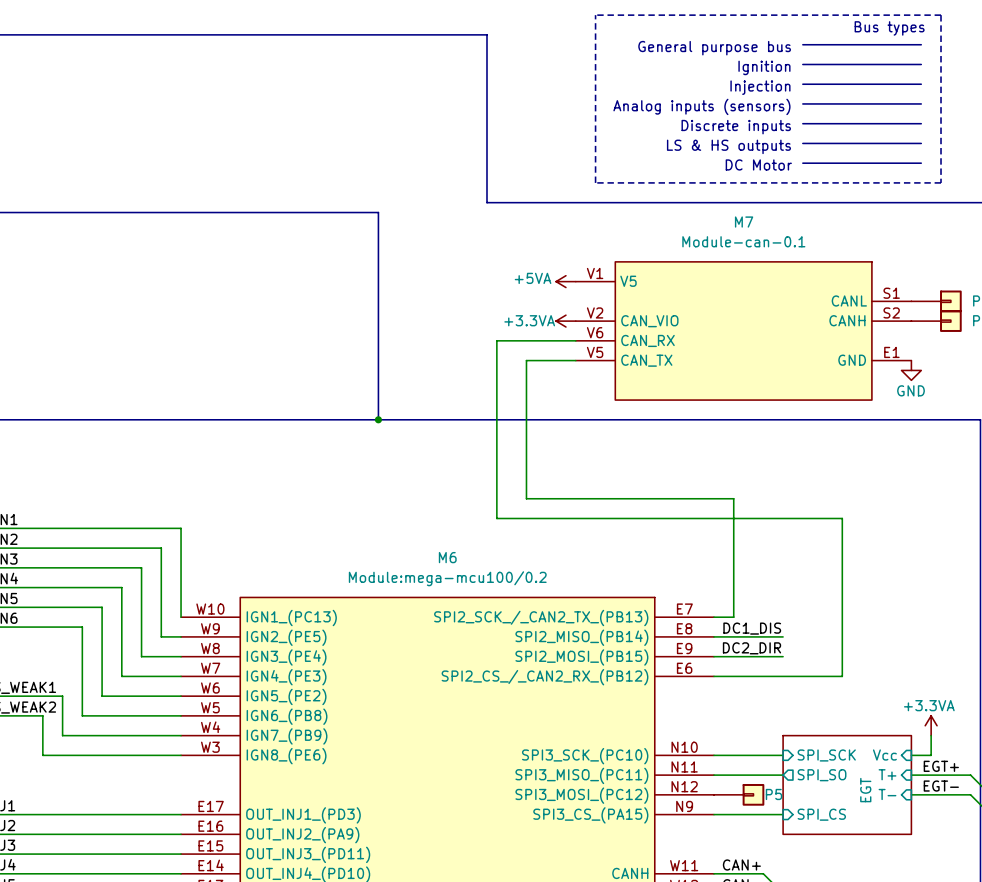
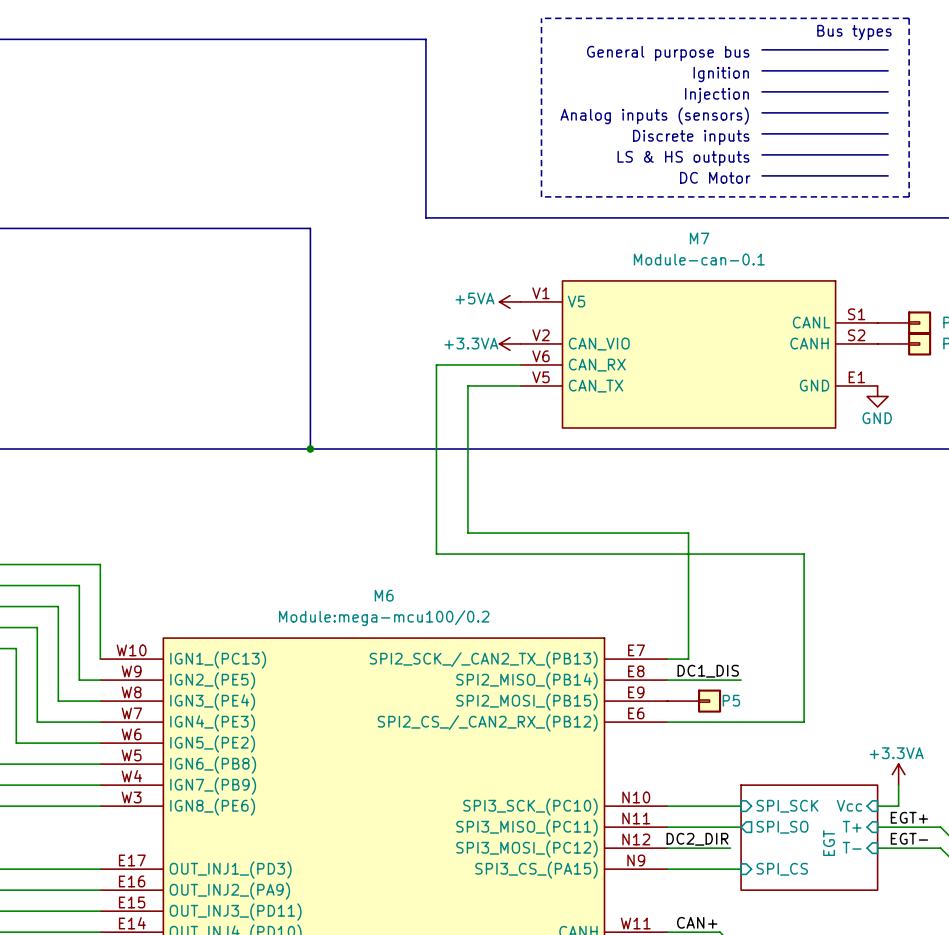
label position: DC2_DIR (751, 648) -> DC2_DIR (697, 839)
P5 position: (739, 794) -> (694, 701)

